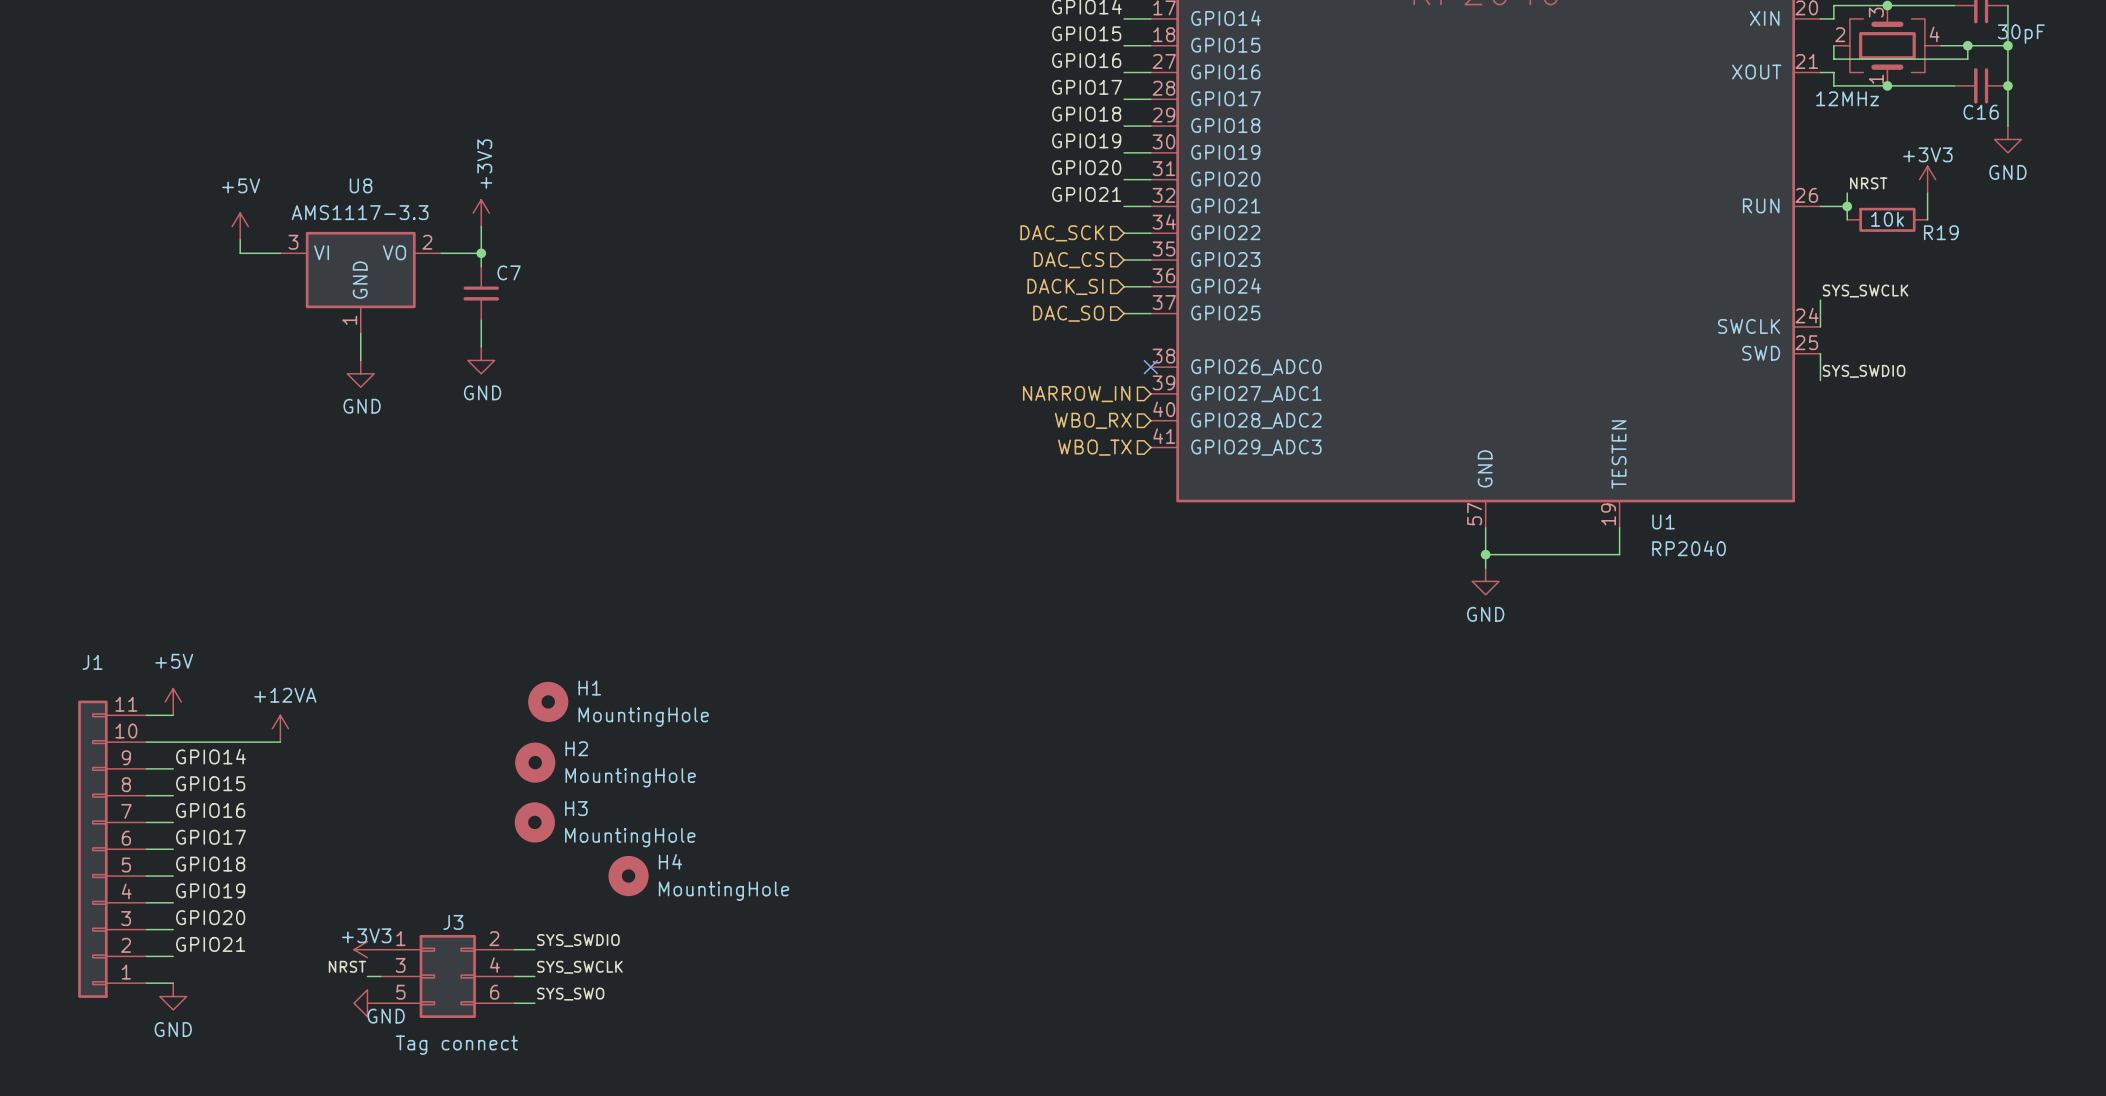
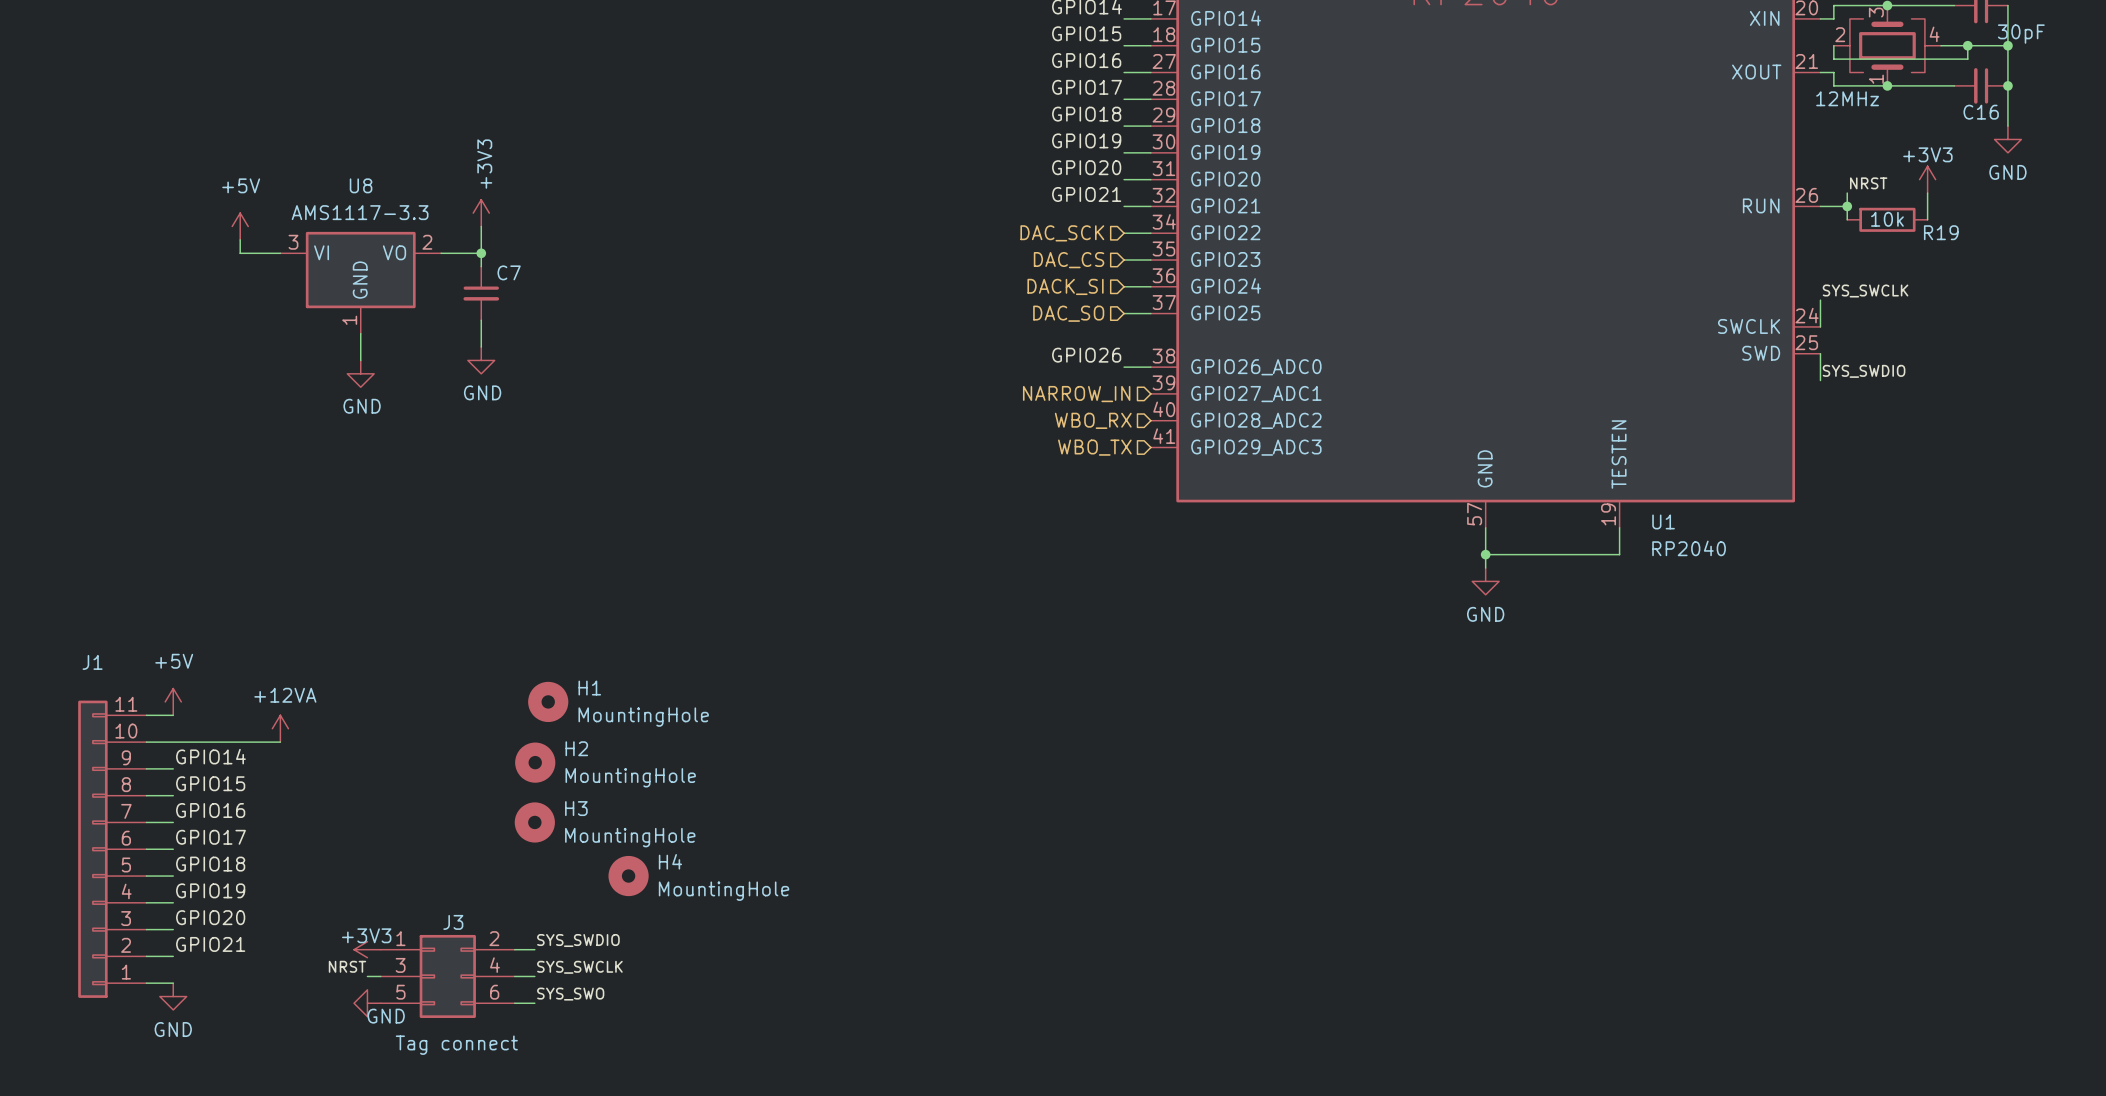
label: none -> GPIO26 (1086, 355)
wire: none -> (1124, 367) (1150, 367)
no-connect mark: (1150, 367) -> none

